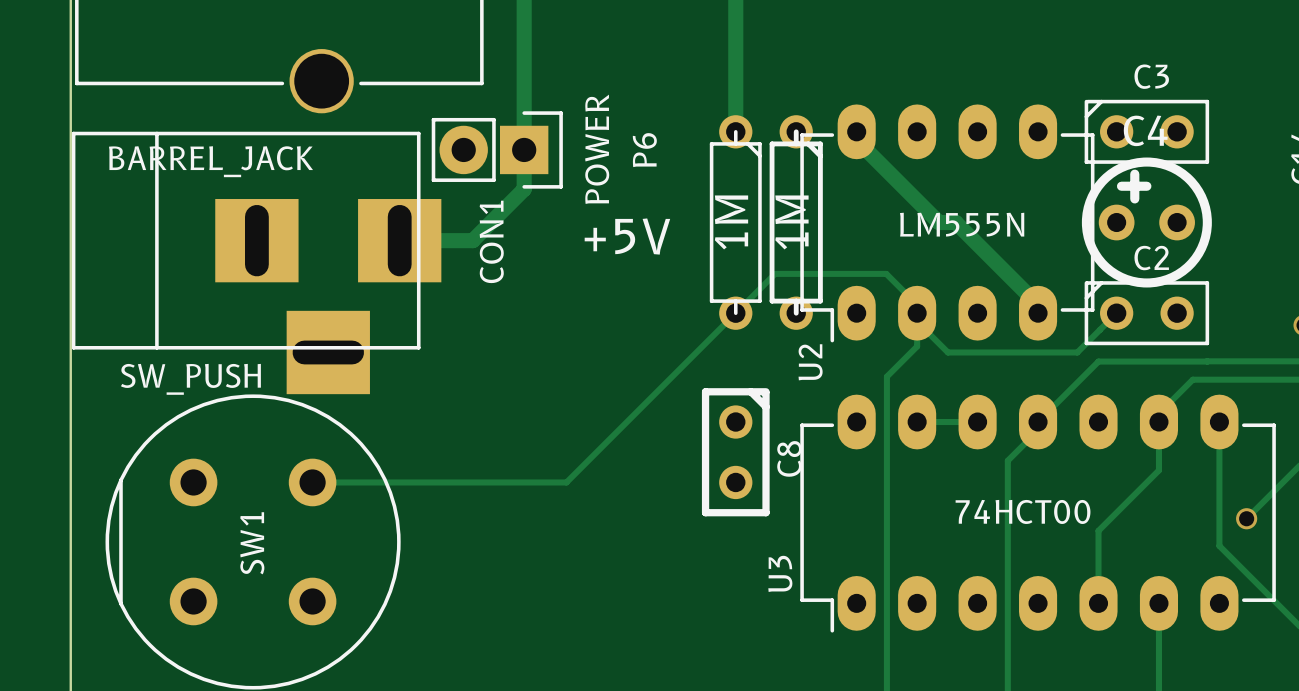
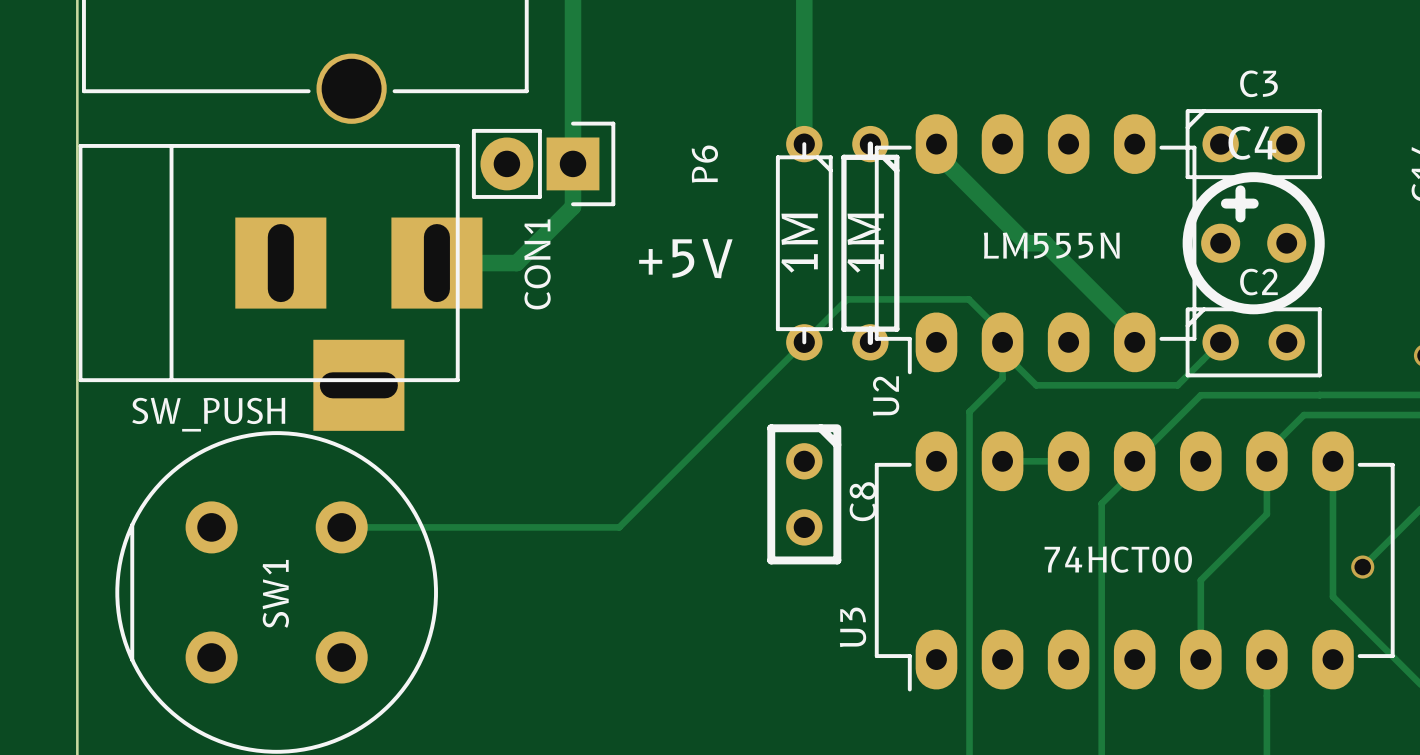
P6 value: POWER (597, 149) -> none
CON1 value: BARREL_JACK (210, 161) -> none

